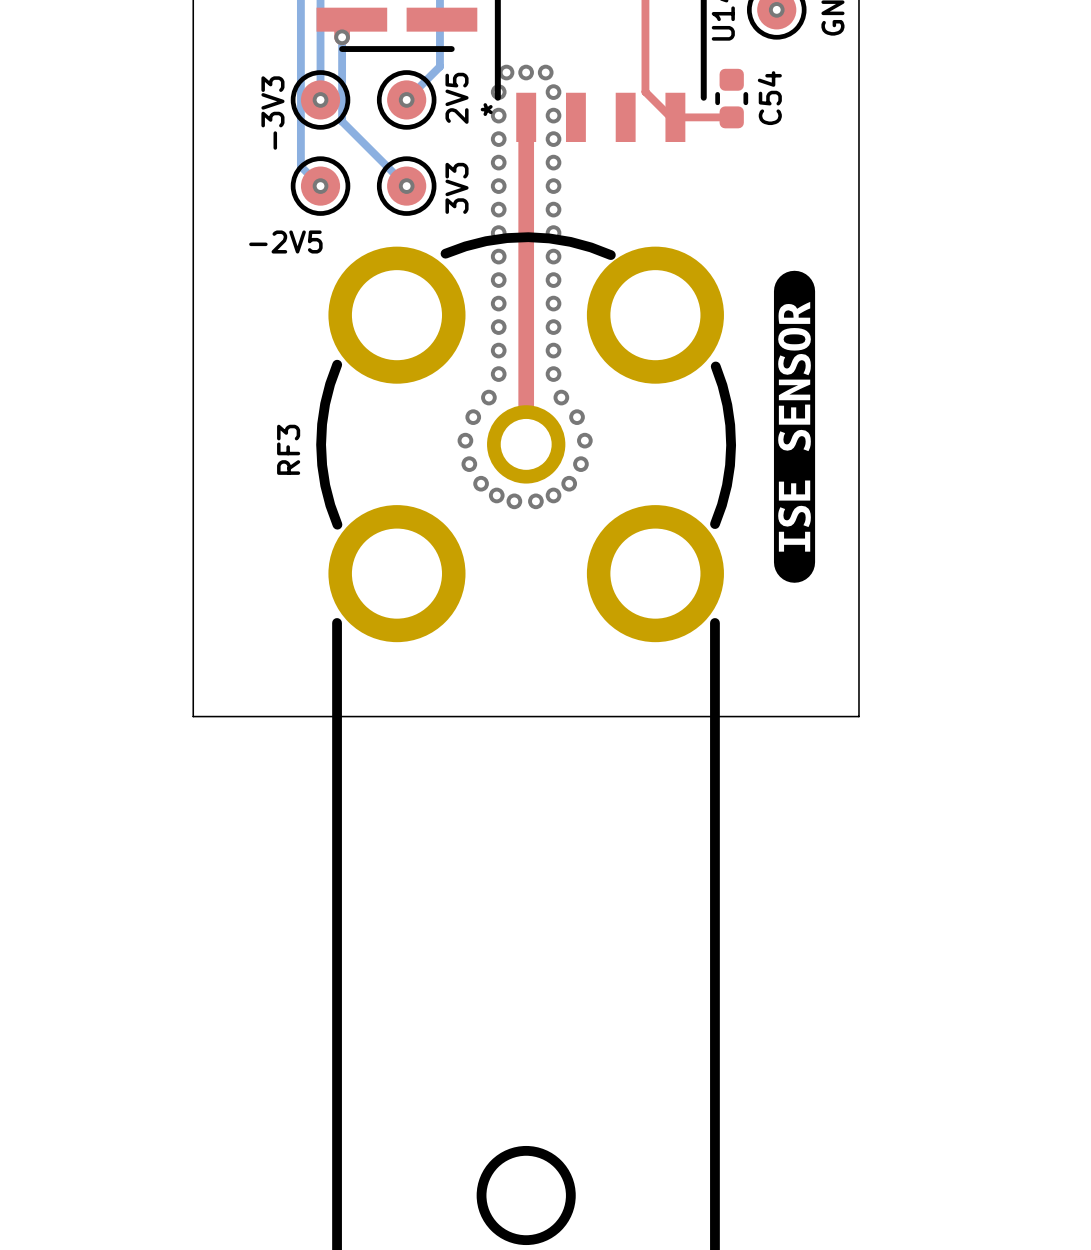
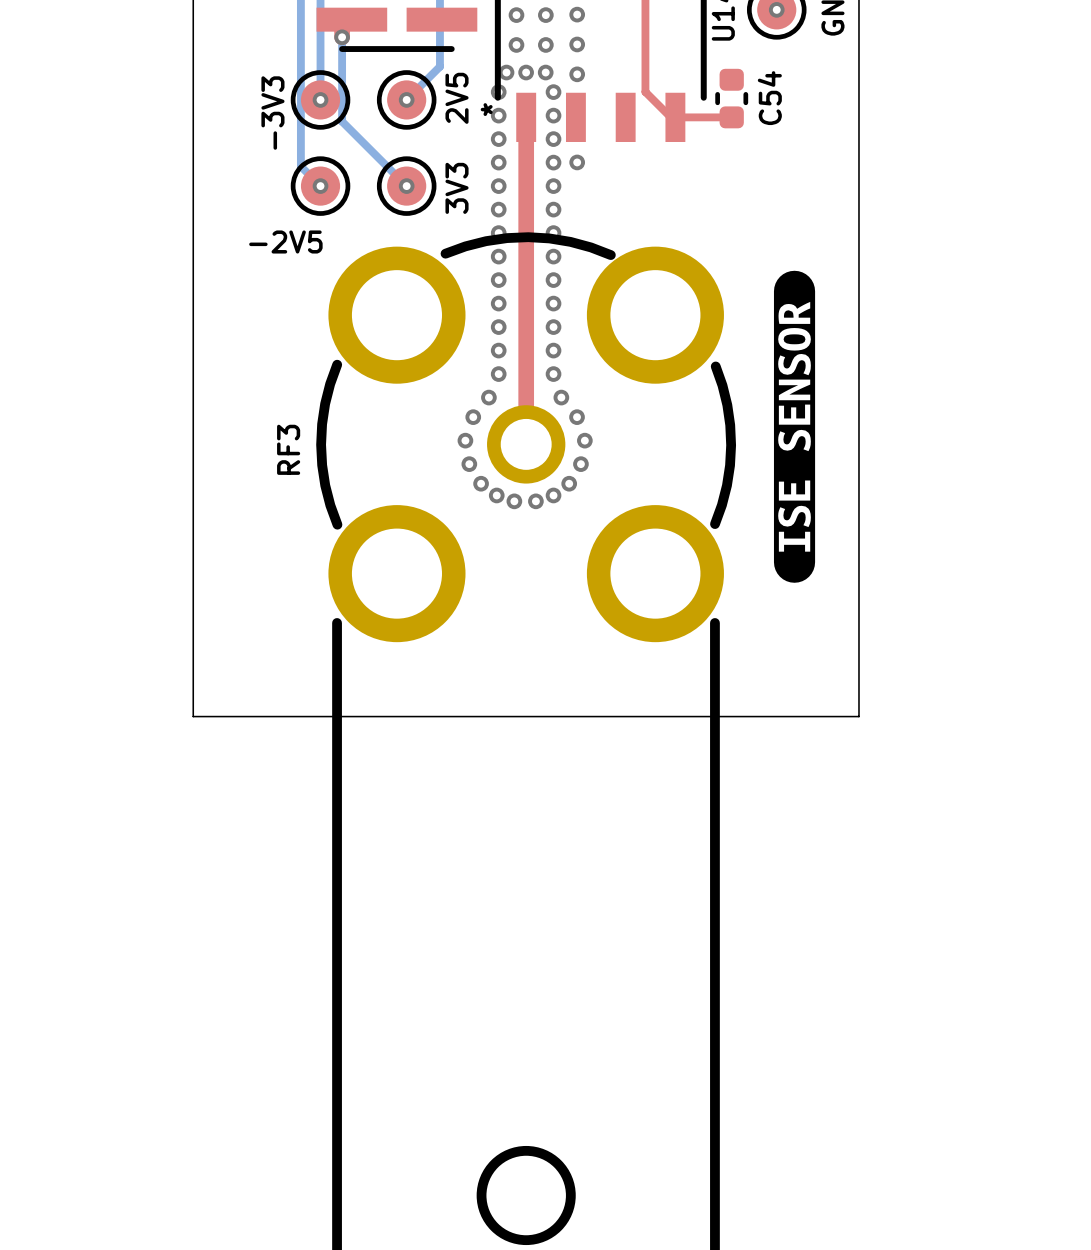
via: none -> (577, 14)
via: none -> (516, 15)
via: none -> (545, 15)
via: none -> (516, 44)
via: none -> (545, 44)
via: none -> (577, 44)
via: none -> (577, 74)
via: none -> (577, 162)

